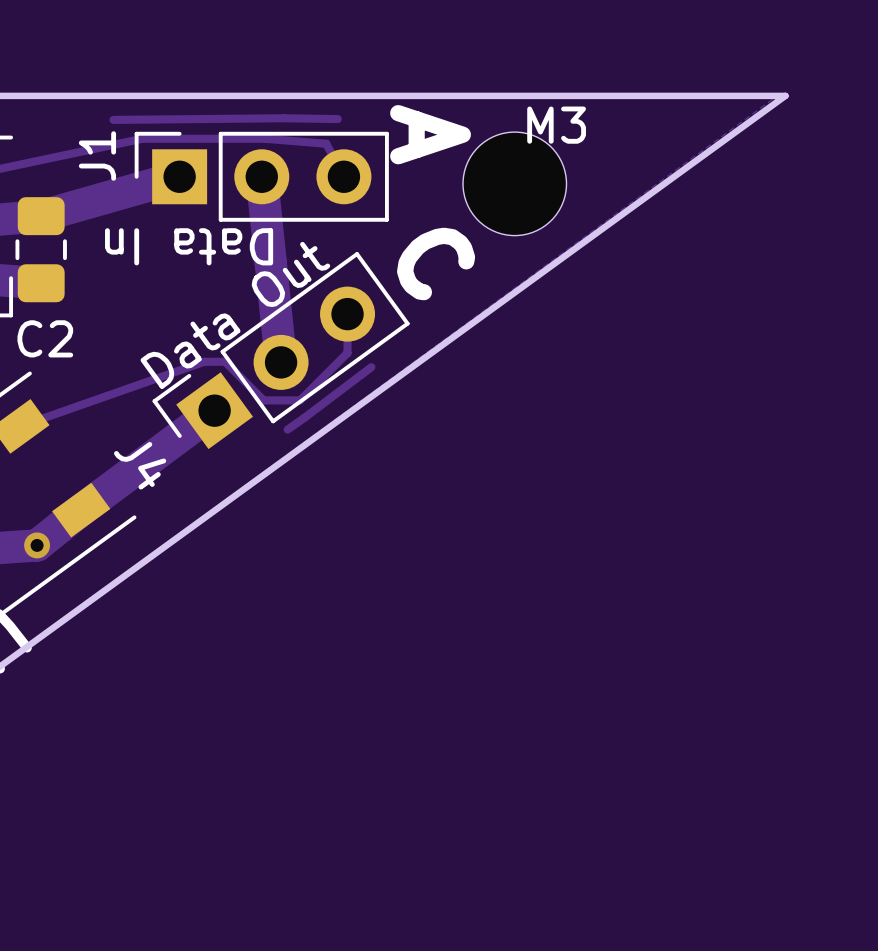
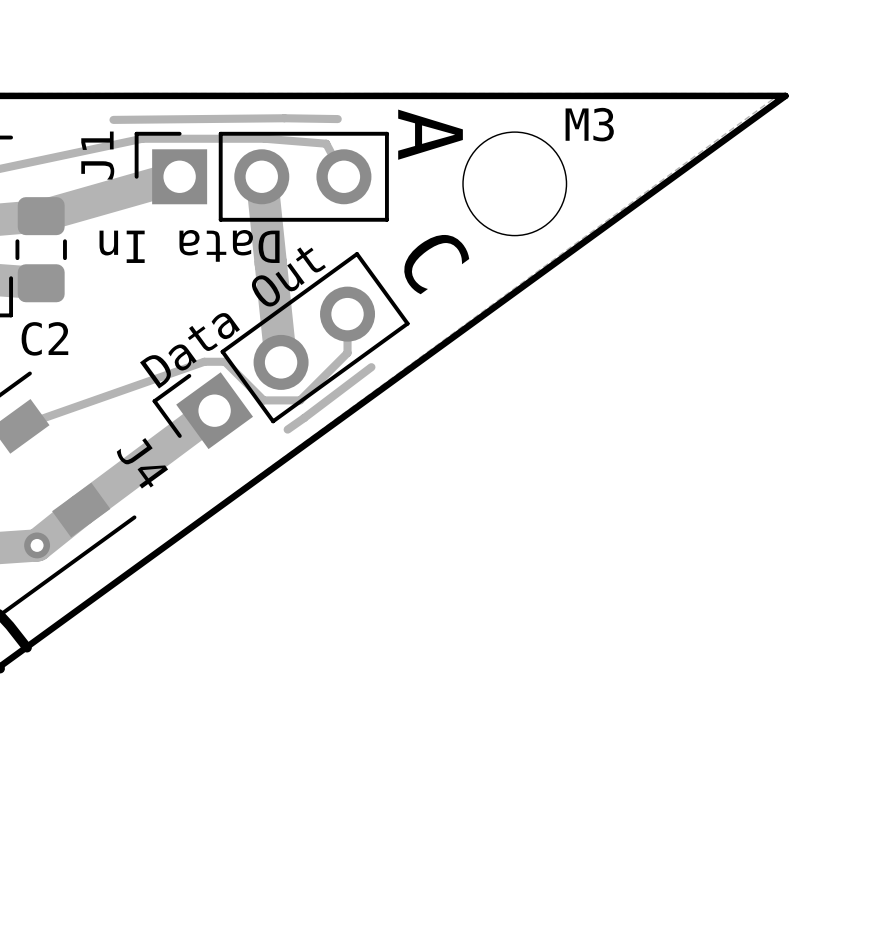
M3 name position: M3 (556, 125) -> M3 (589, 124)

